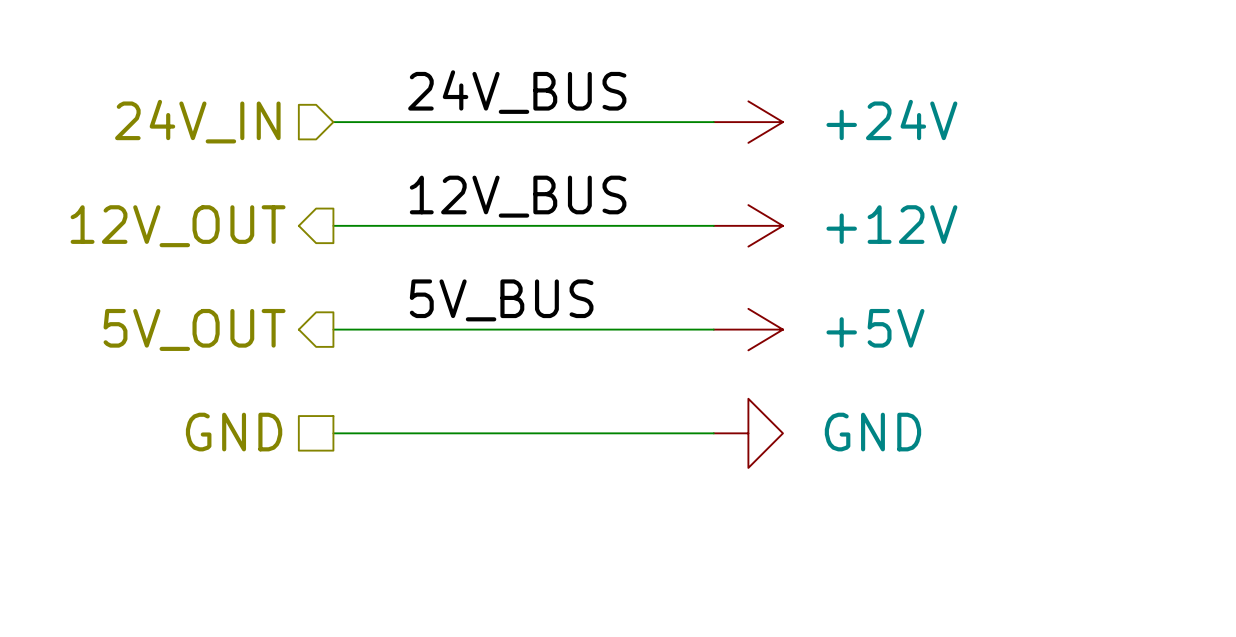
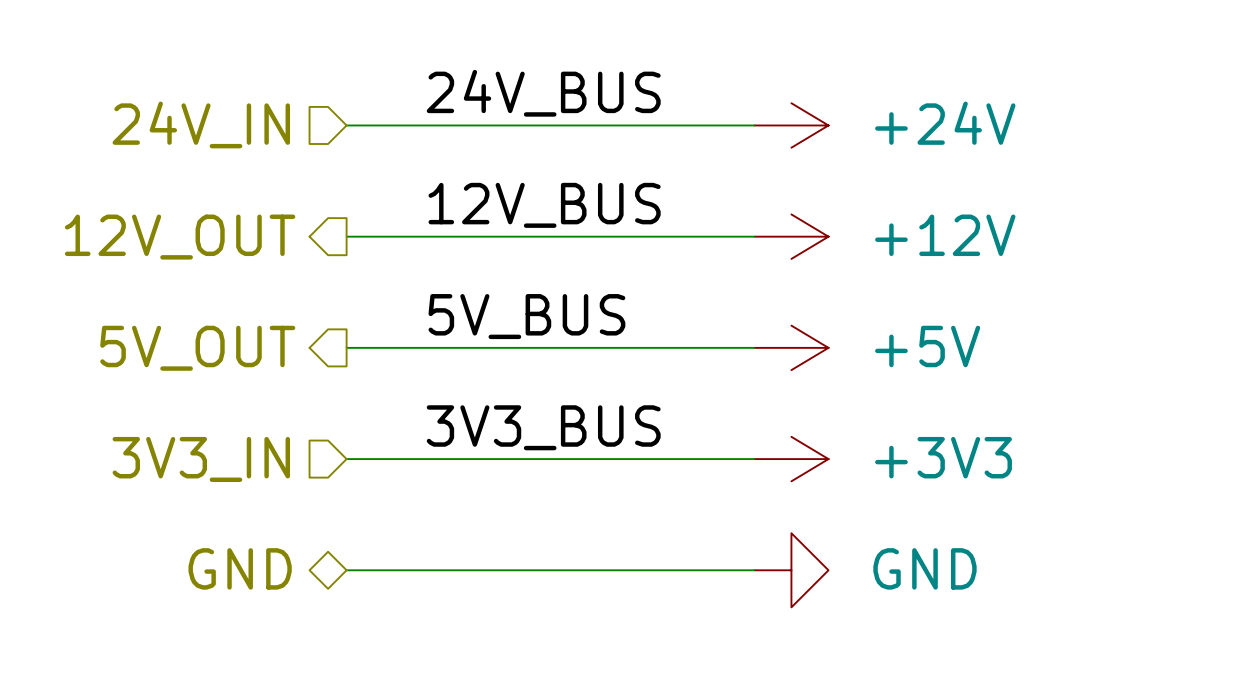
label: none -> 3V3_BUS (543, 427)
hierarchical label shape: passive (234, 432) -> input (201, 459)
hierarchical label: GND (234, 432) -> 3V3_IN (201, 459)
power symbol: GND (748, 433) -> +3V3 (791, 459)
hierarchical label: none -> GND (240, 568)
wire: none -> (346, 570) (754, 570)
power symbol: none -> GND (791, 570)

